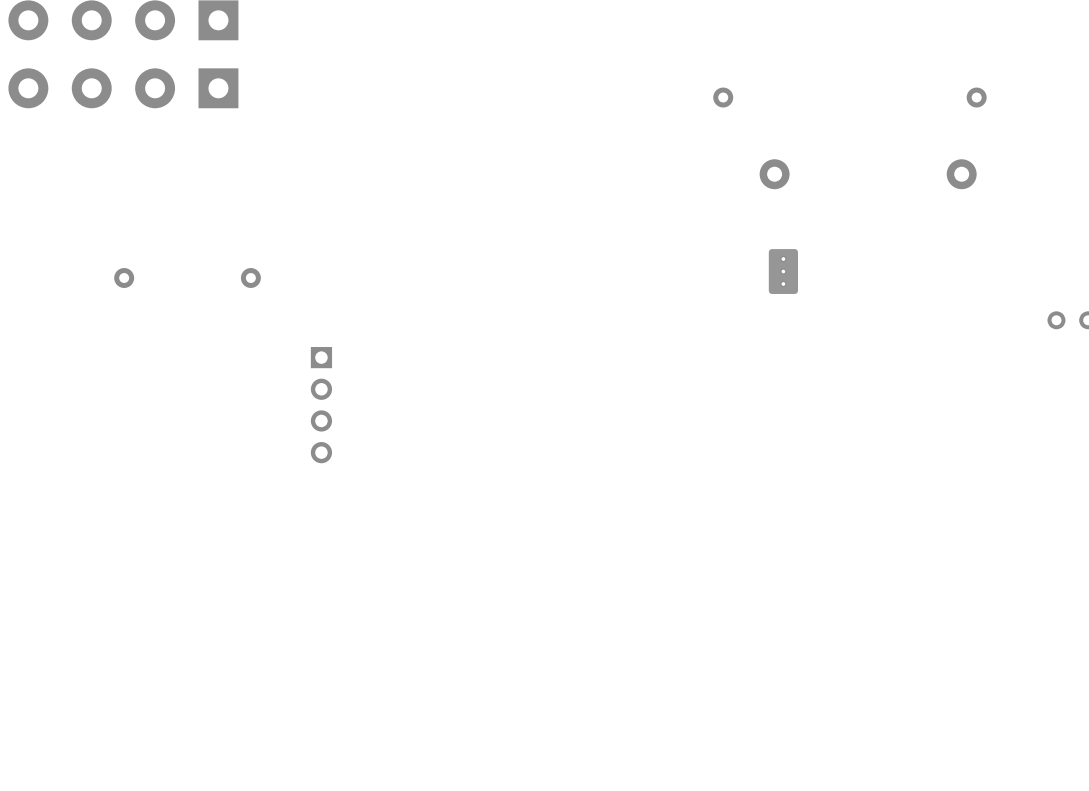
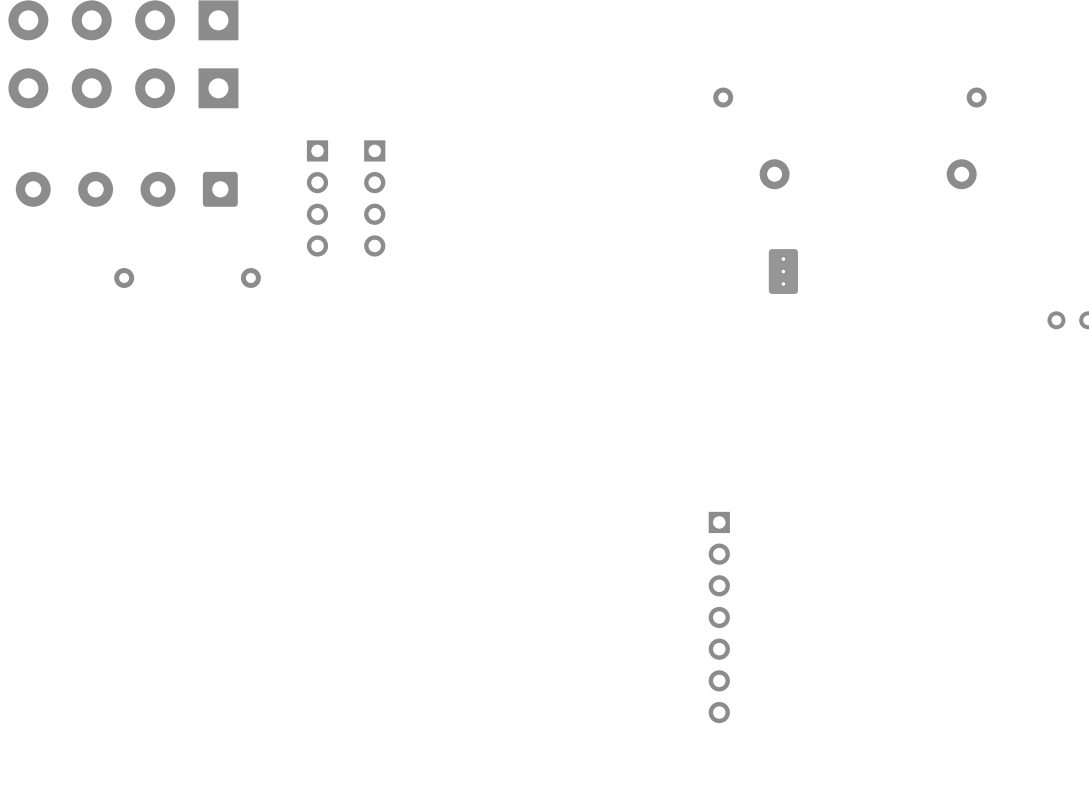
part: none -> (126, 189)
part: none -> (317, 198)
part: none -> (374, 198)
part: (321, 405) -> none
part: none -> (719, 617)

